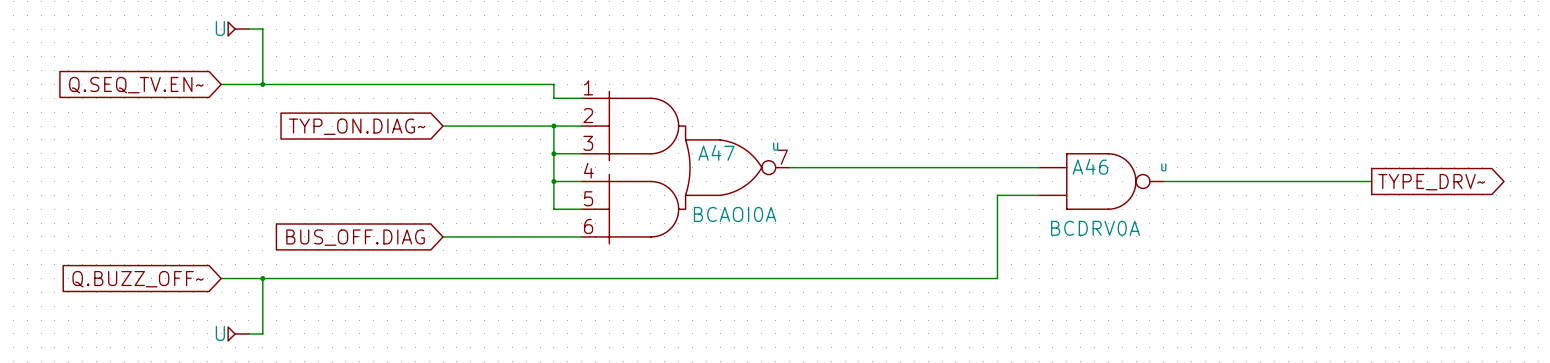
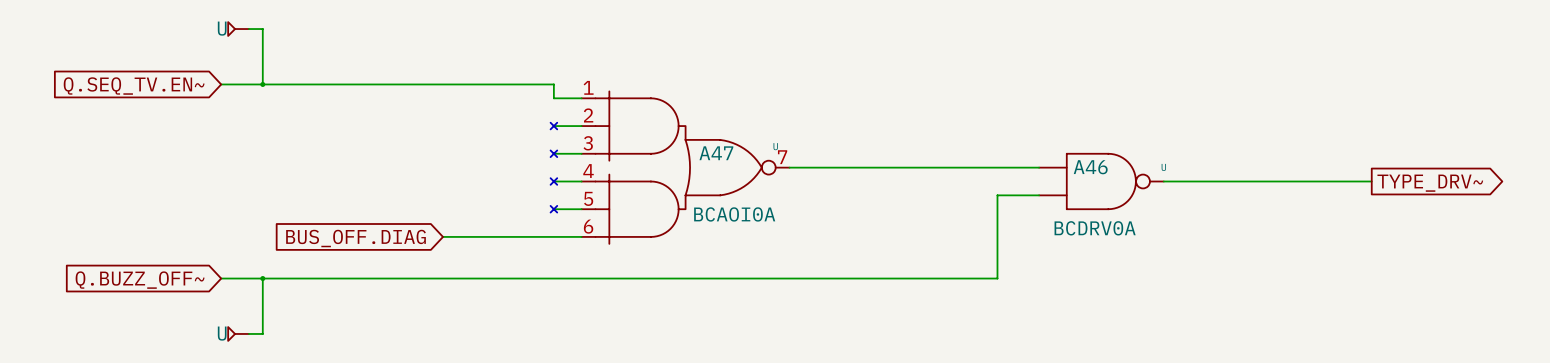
global label: TYP_ON.DIAG~ (357, 126) -> none
wire: (443, 126) (553, 126) (553, 209) -> none
junction: (553, 126) -> none
no-connect mark: none -> (553, 126)
junction: (553, 153) -> none
no-connect mark: none -> (553, 153)
junction: (553, 181) -> none
no-connect mark: none -> (553, 181)
no-connect mark: none -> (553, 209)

